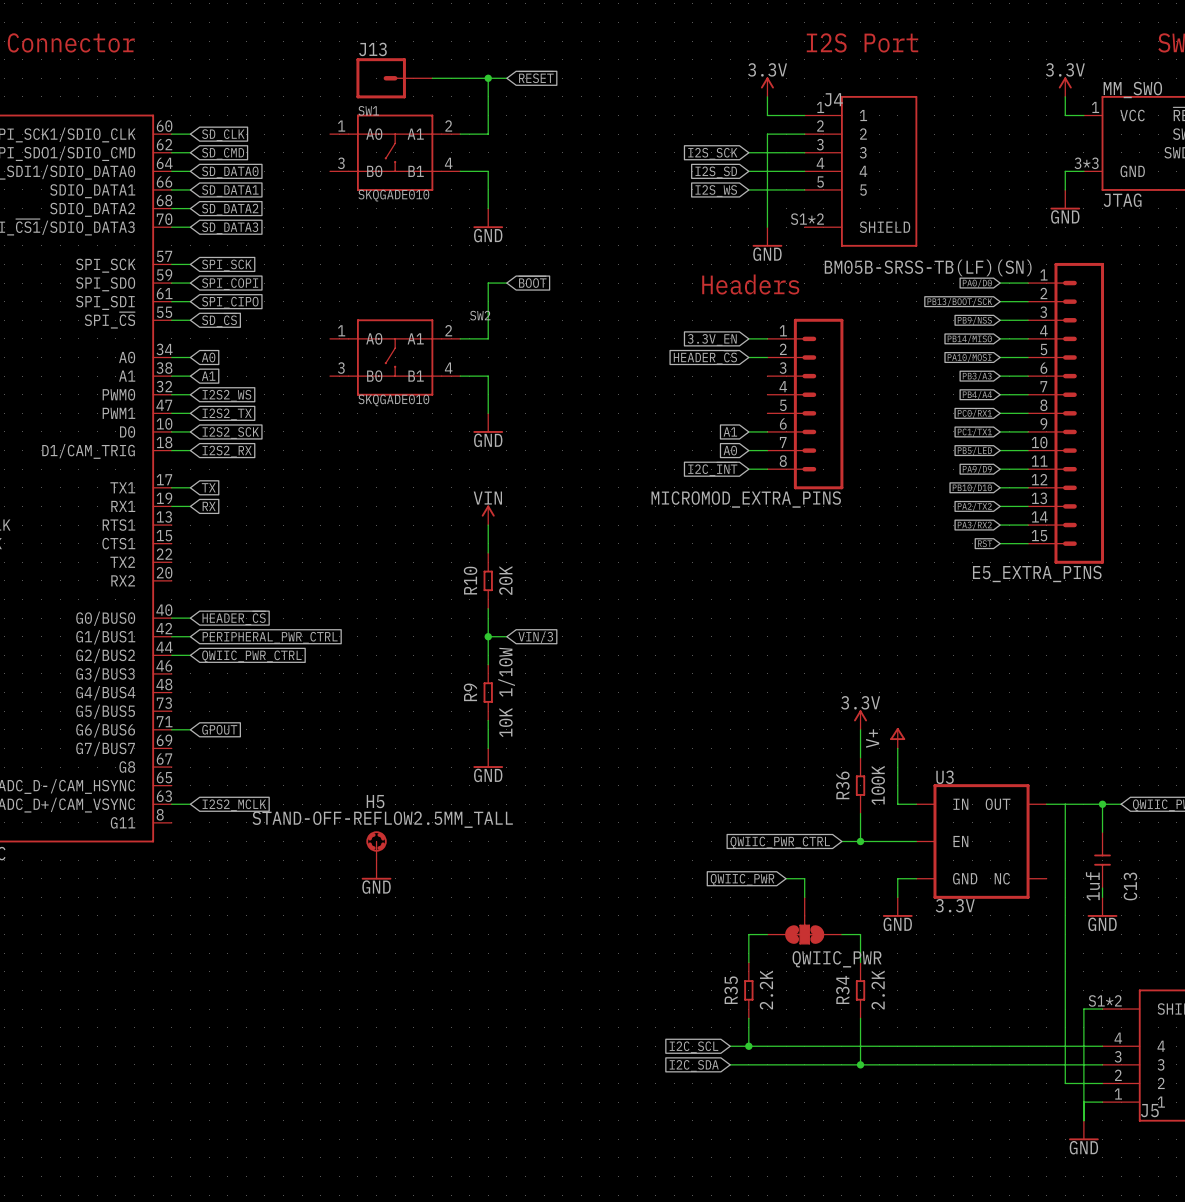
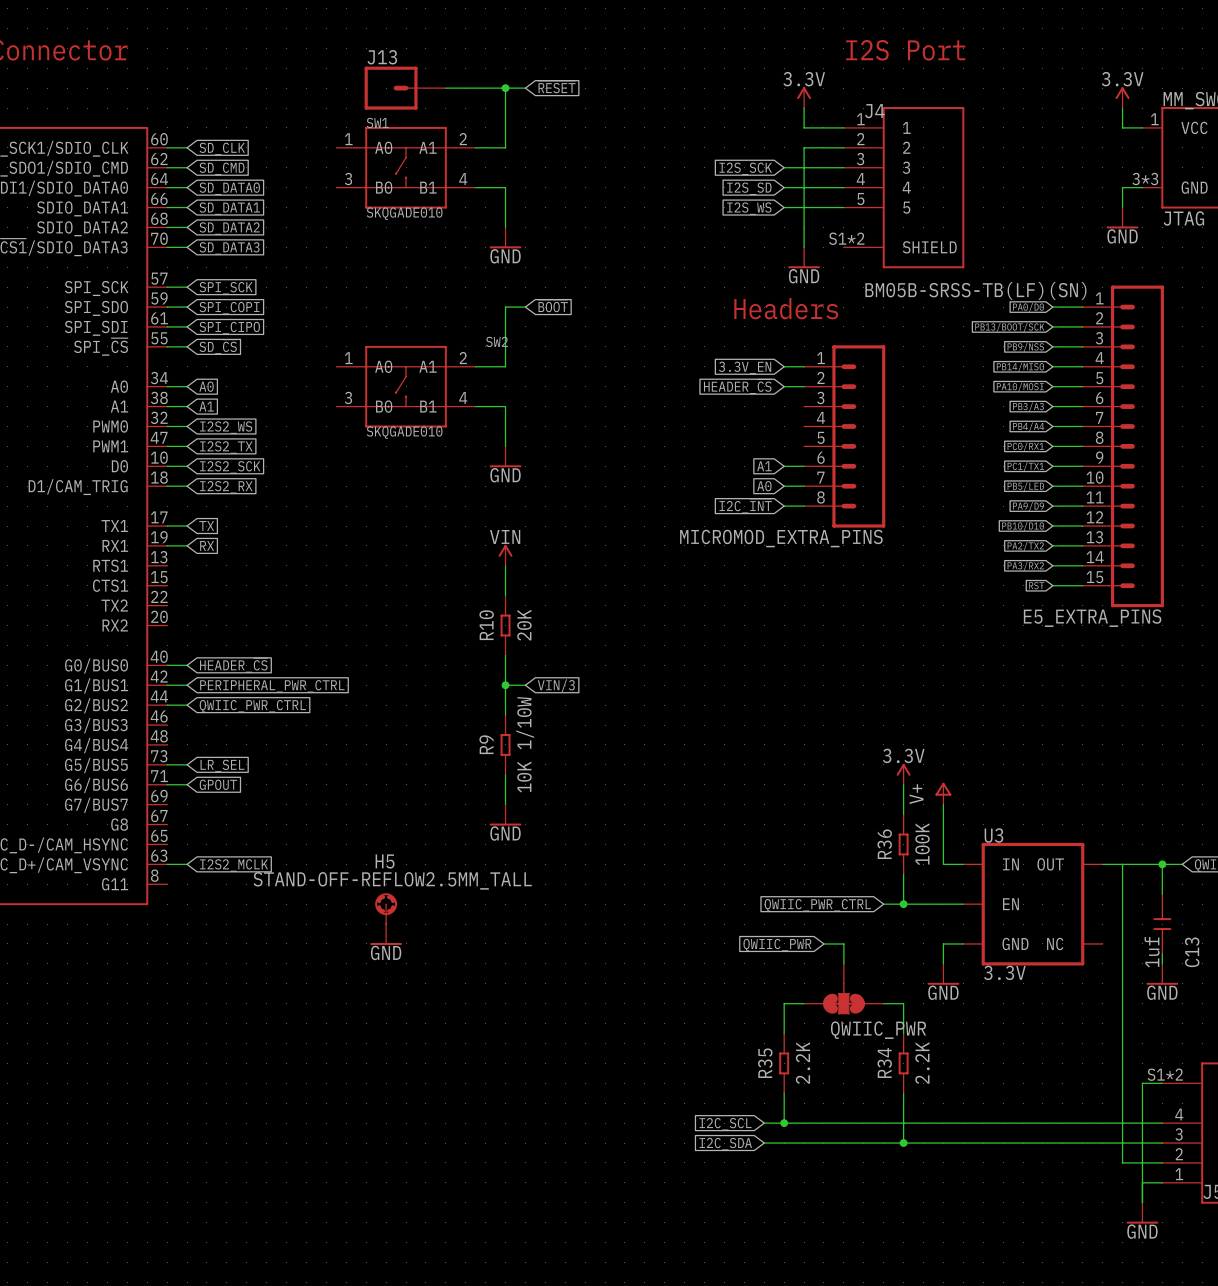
wire: none -> (167, 764) (187, 764)
global label: none -> LR_SEL (222, 765)

